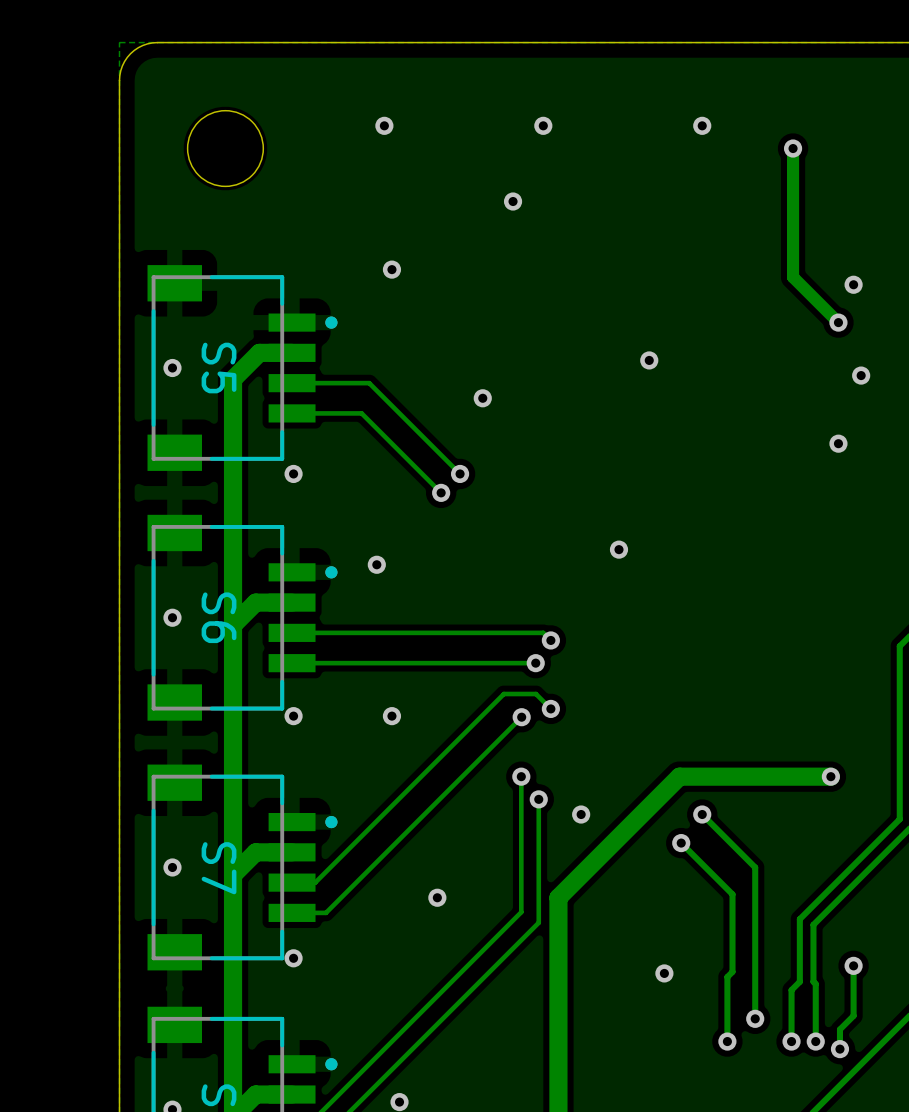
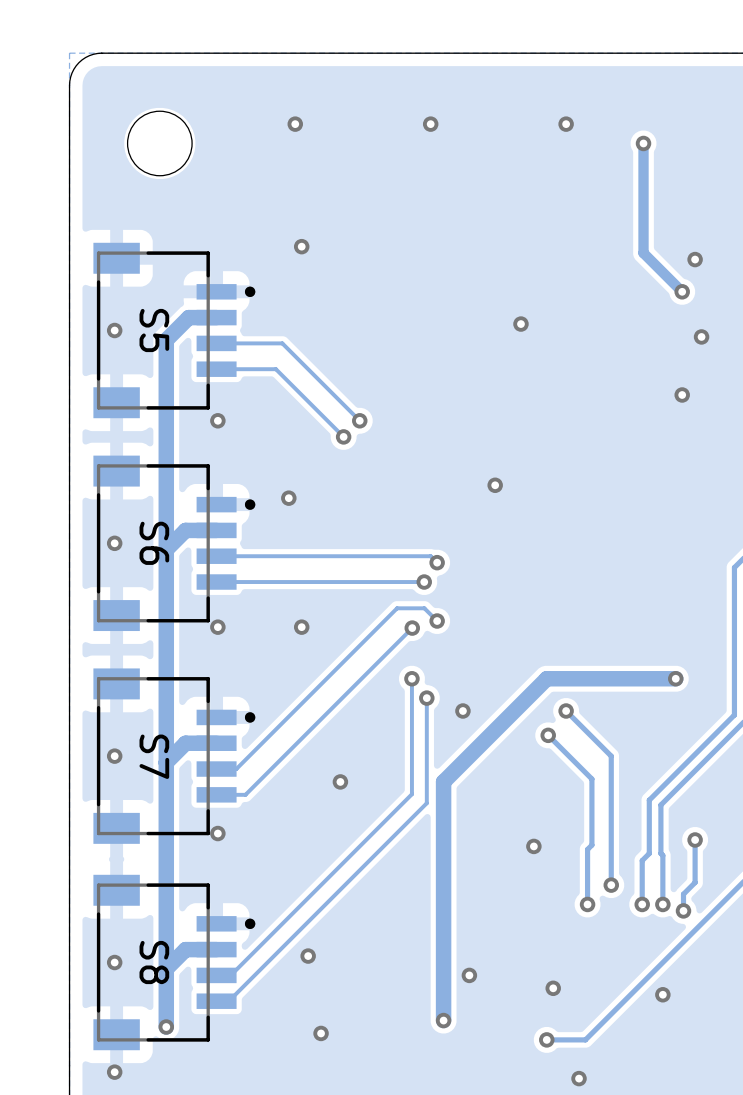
via: (513, 201) -> none
via: (482, 398) -> none

